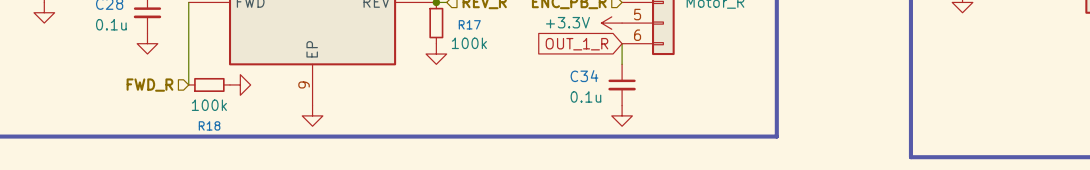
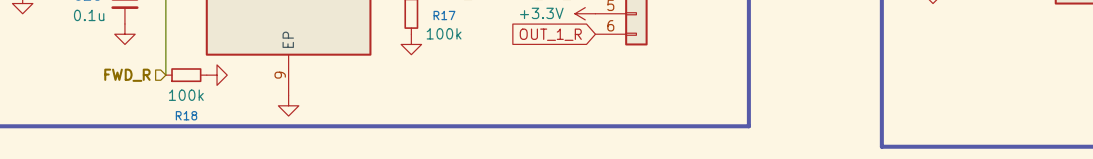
wire: (622, 43) (622, 64) -> none
C34: 0.1u (622, 84) -> none
power symbol: (622, 115) -> none

